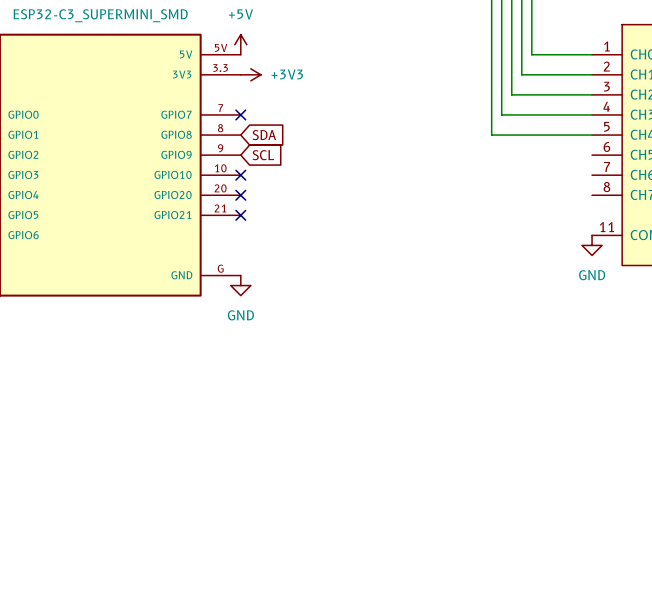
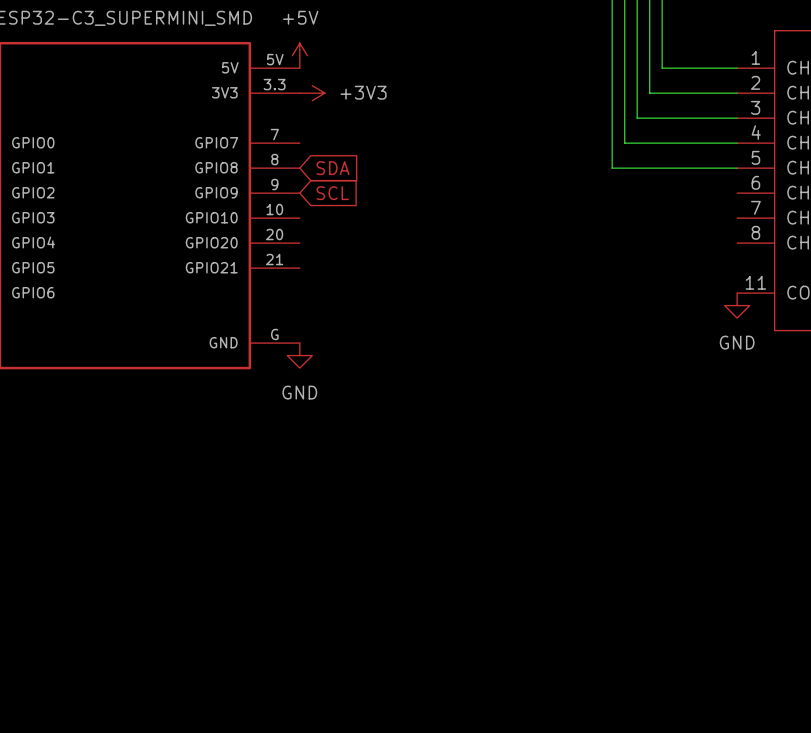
no-connect mark: (240, 114) -> none
no-connect mark: (240, 175) -> none
no-connect mark: (240, 195) -> none
no-connect mark: (240, 215) -> none

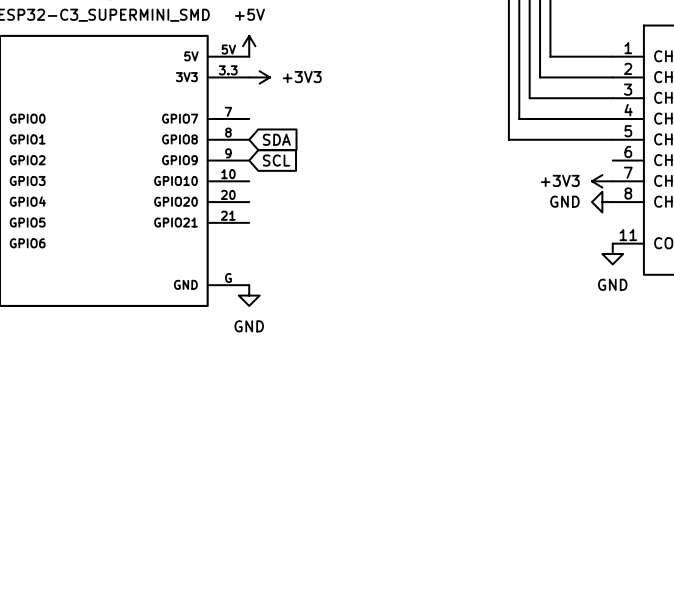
power symbol: none -> +3V3 (602, 181)
power symbol: none -> GND (602, 202)

